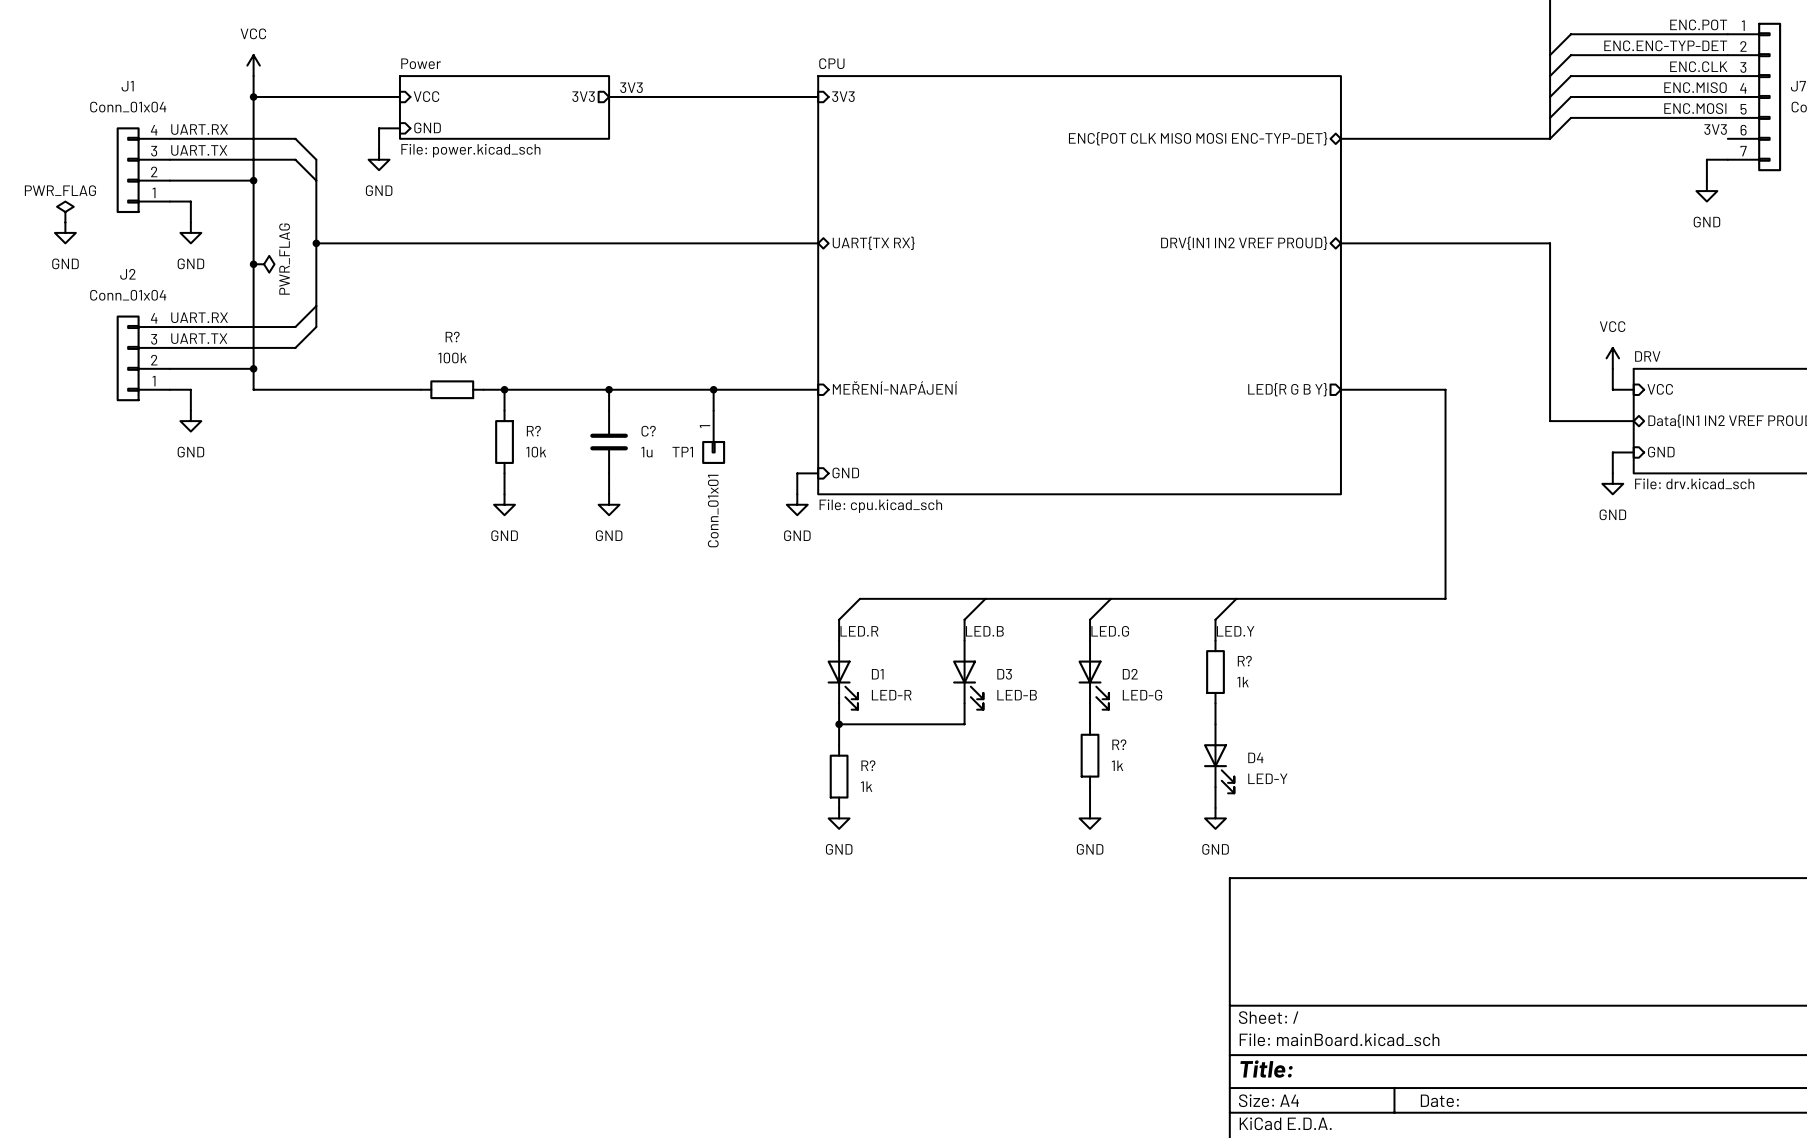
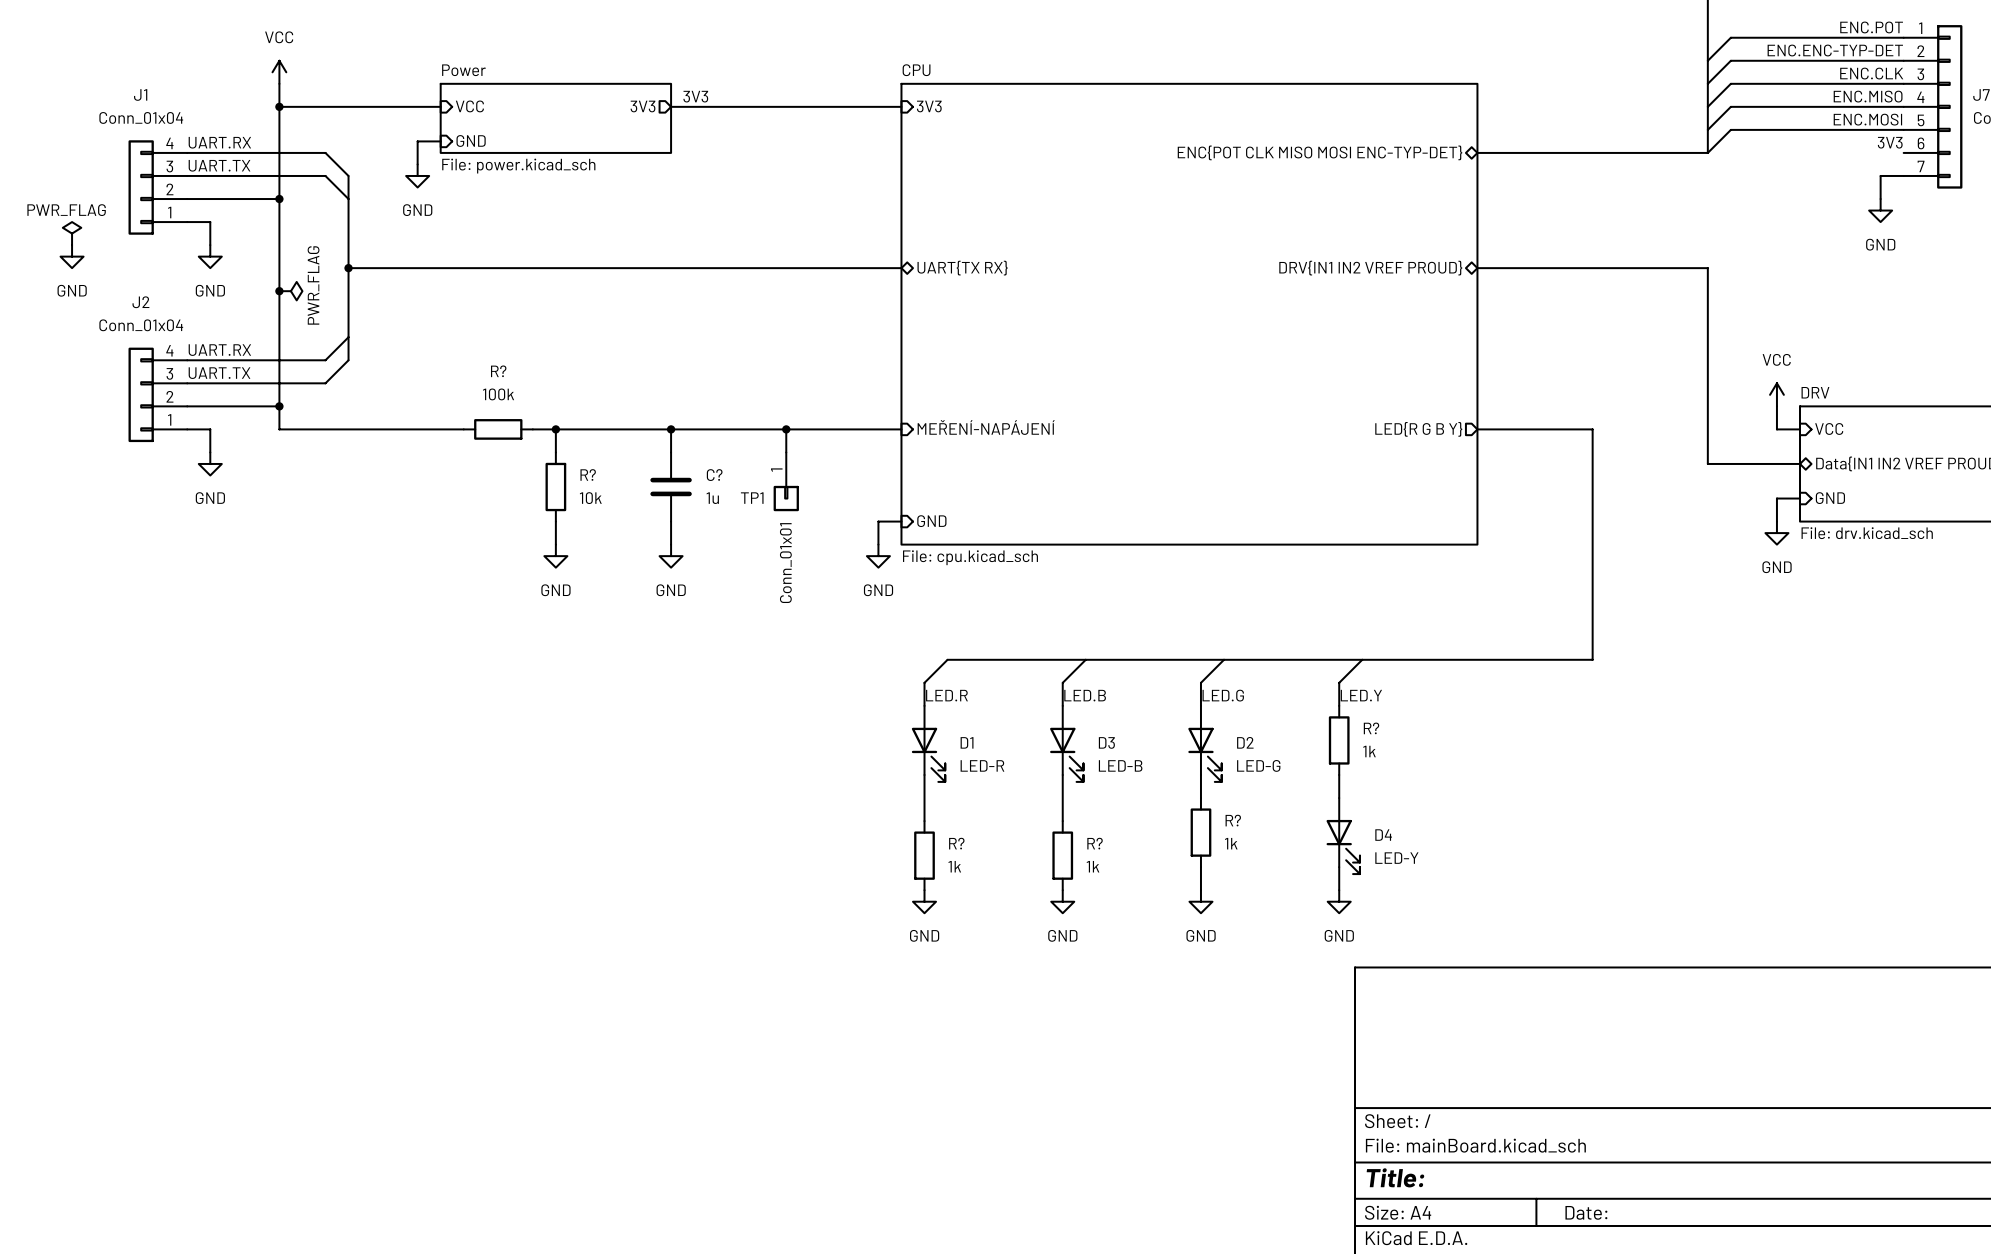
wire: (839, 724) (964, 724) -> (1062, 821) (1062, 798)
junction: (839, 724) -> none
R?: none -> 1k (1062, 855)
power symbol: none -> GND (1062, 901)

